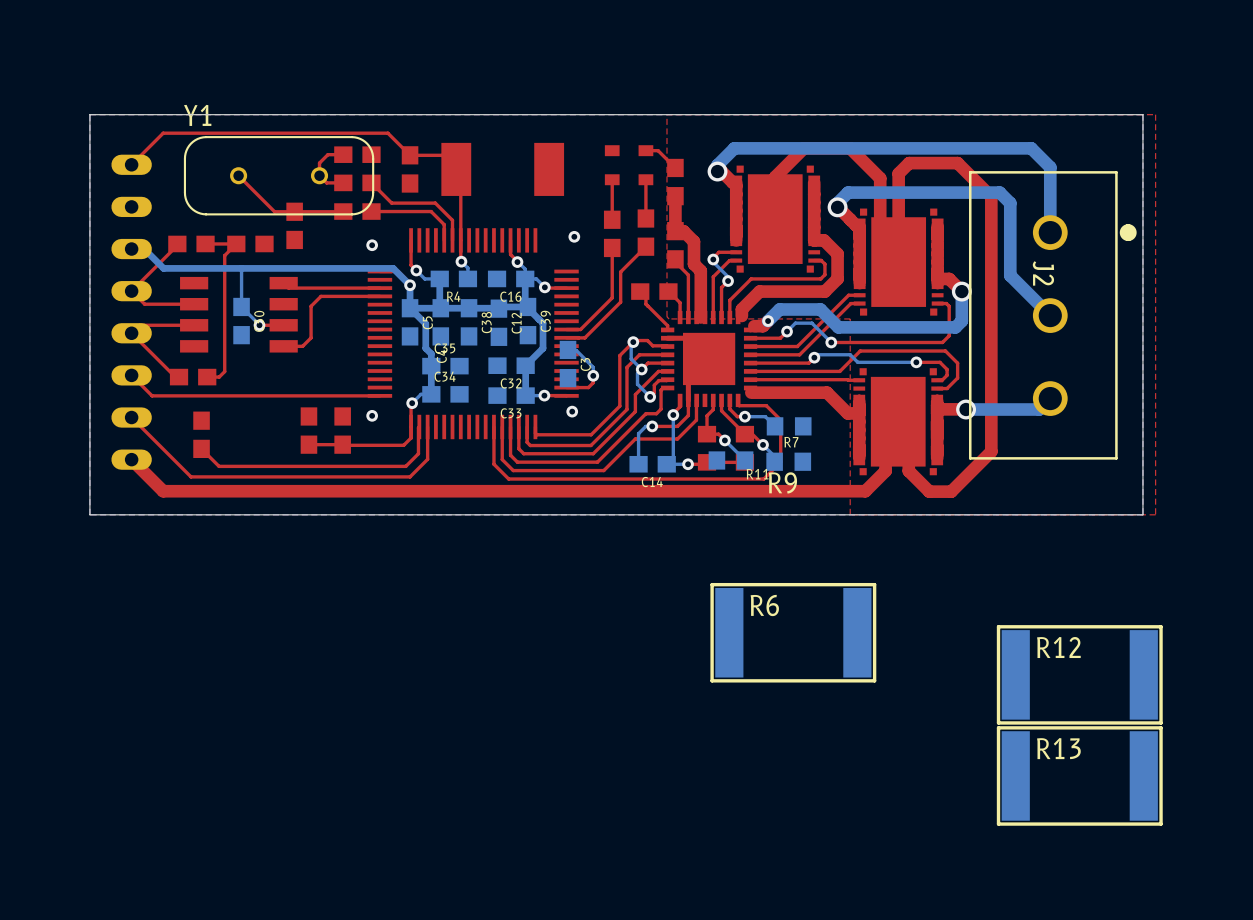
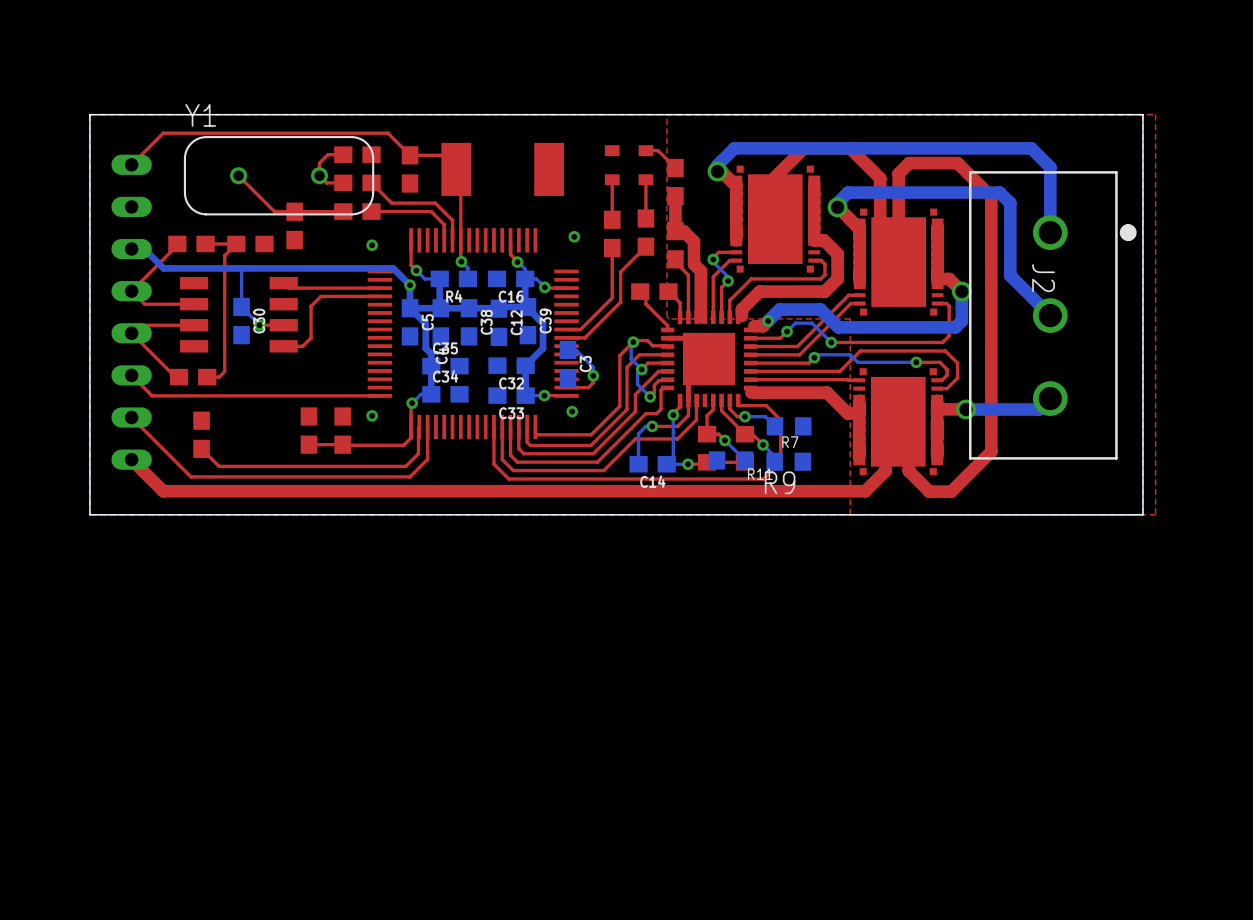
R6: (793, 632) -> none
R12: (1079, 674) -> none
R13: (1079, 775) -> none

